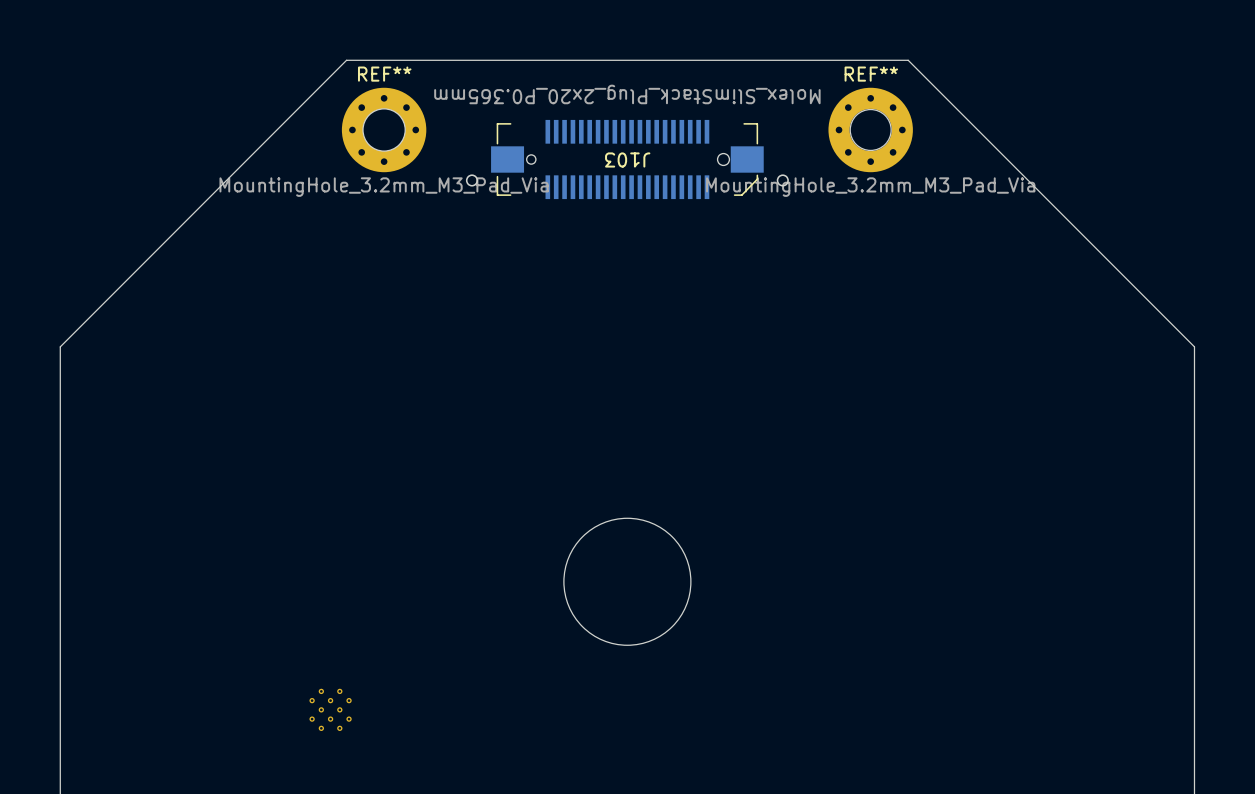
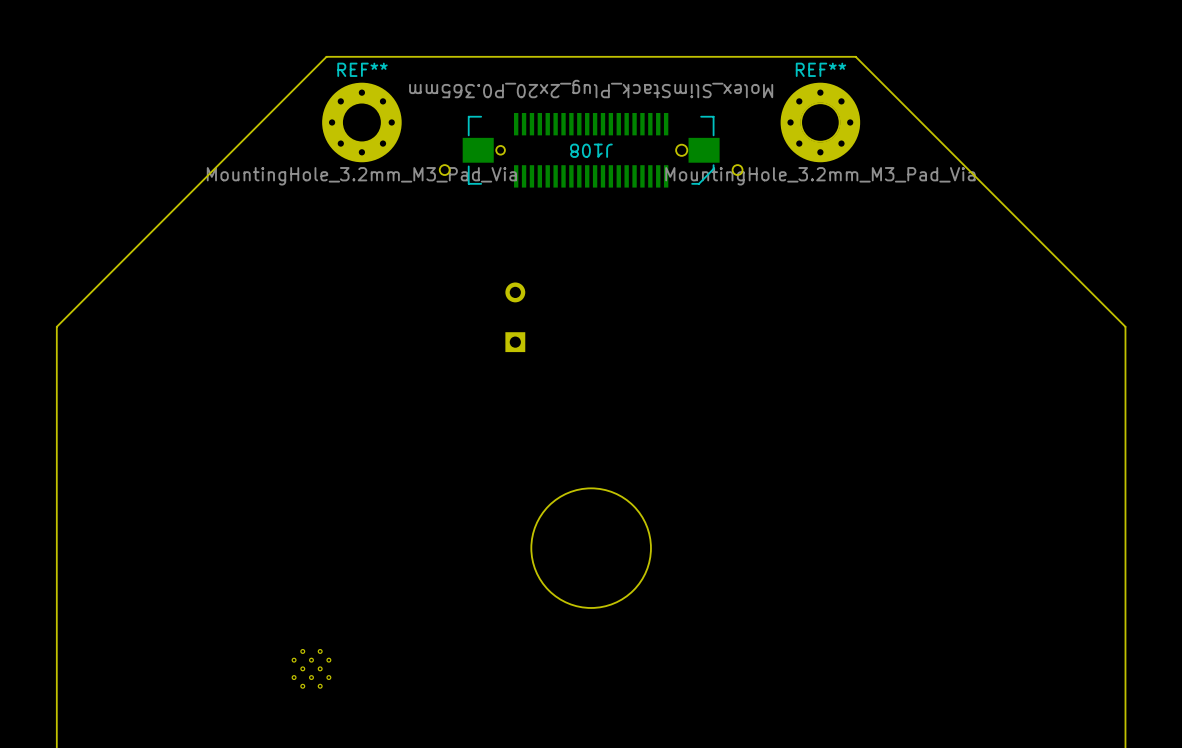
J103 name: J103 (627, 159) -> J108 (591, 150)
part: none -> (515, 317)

